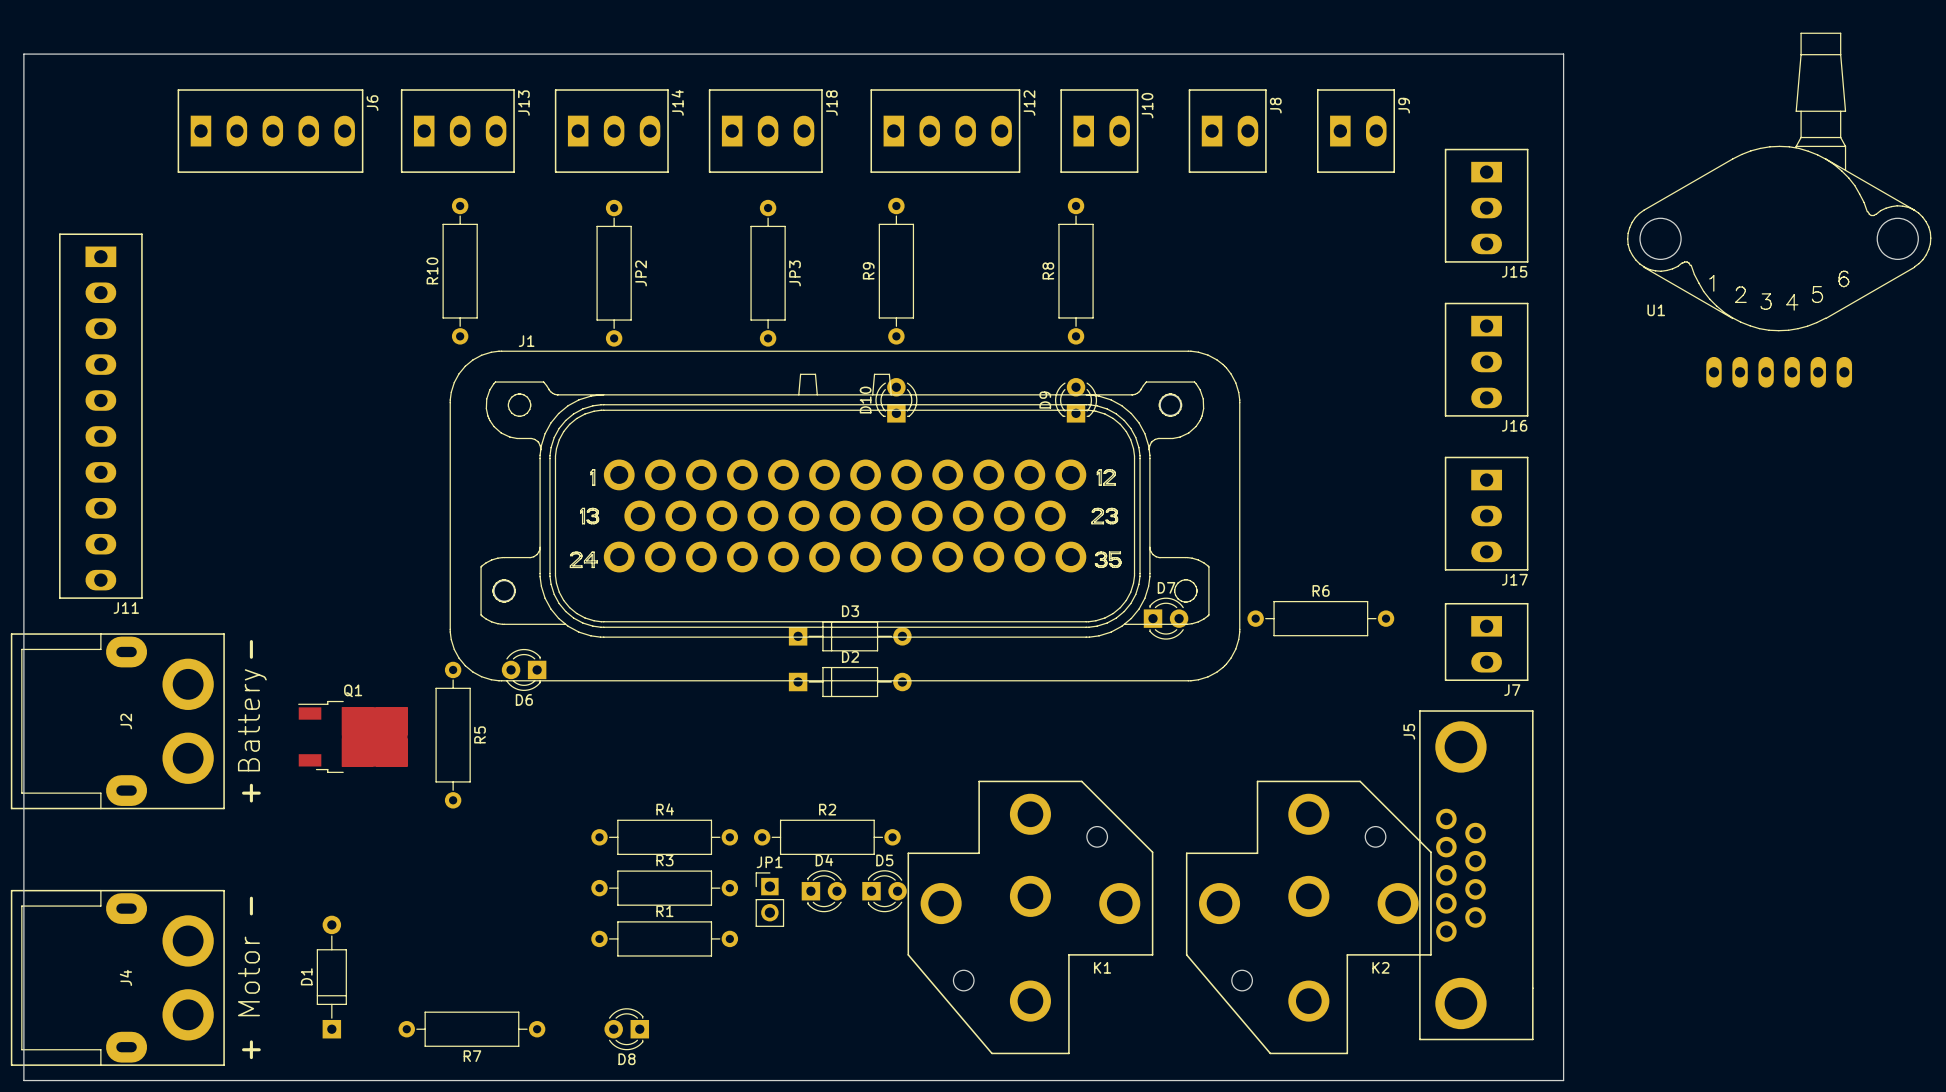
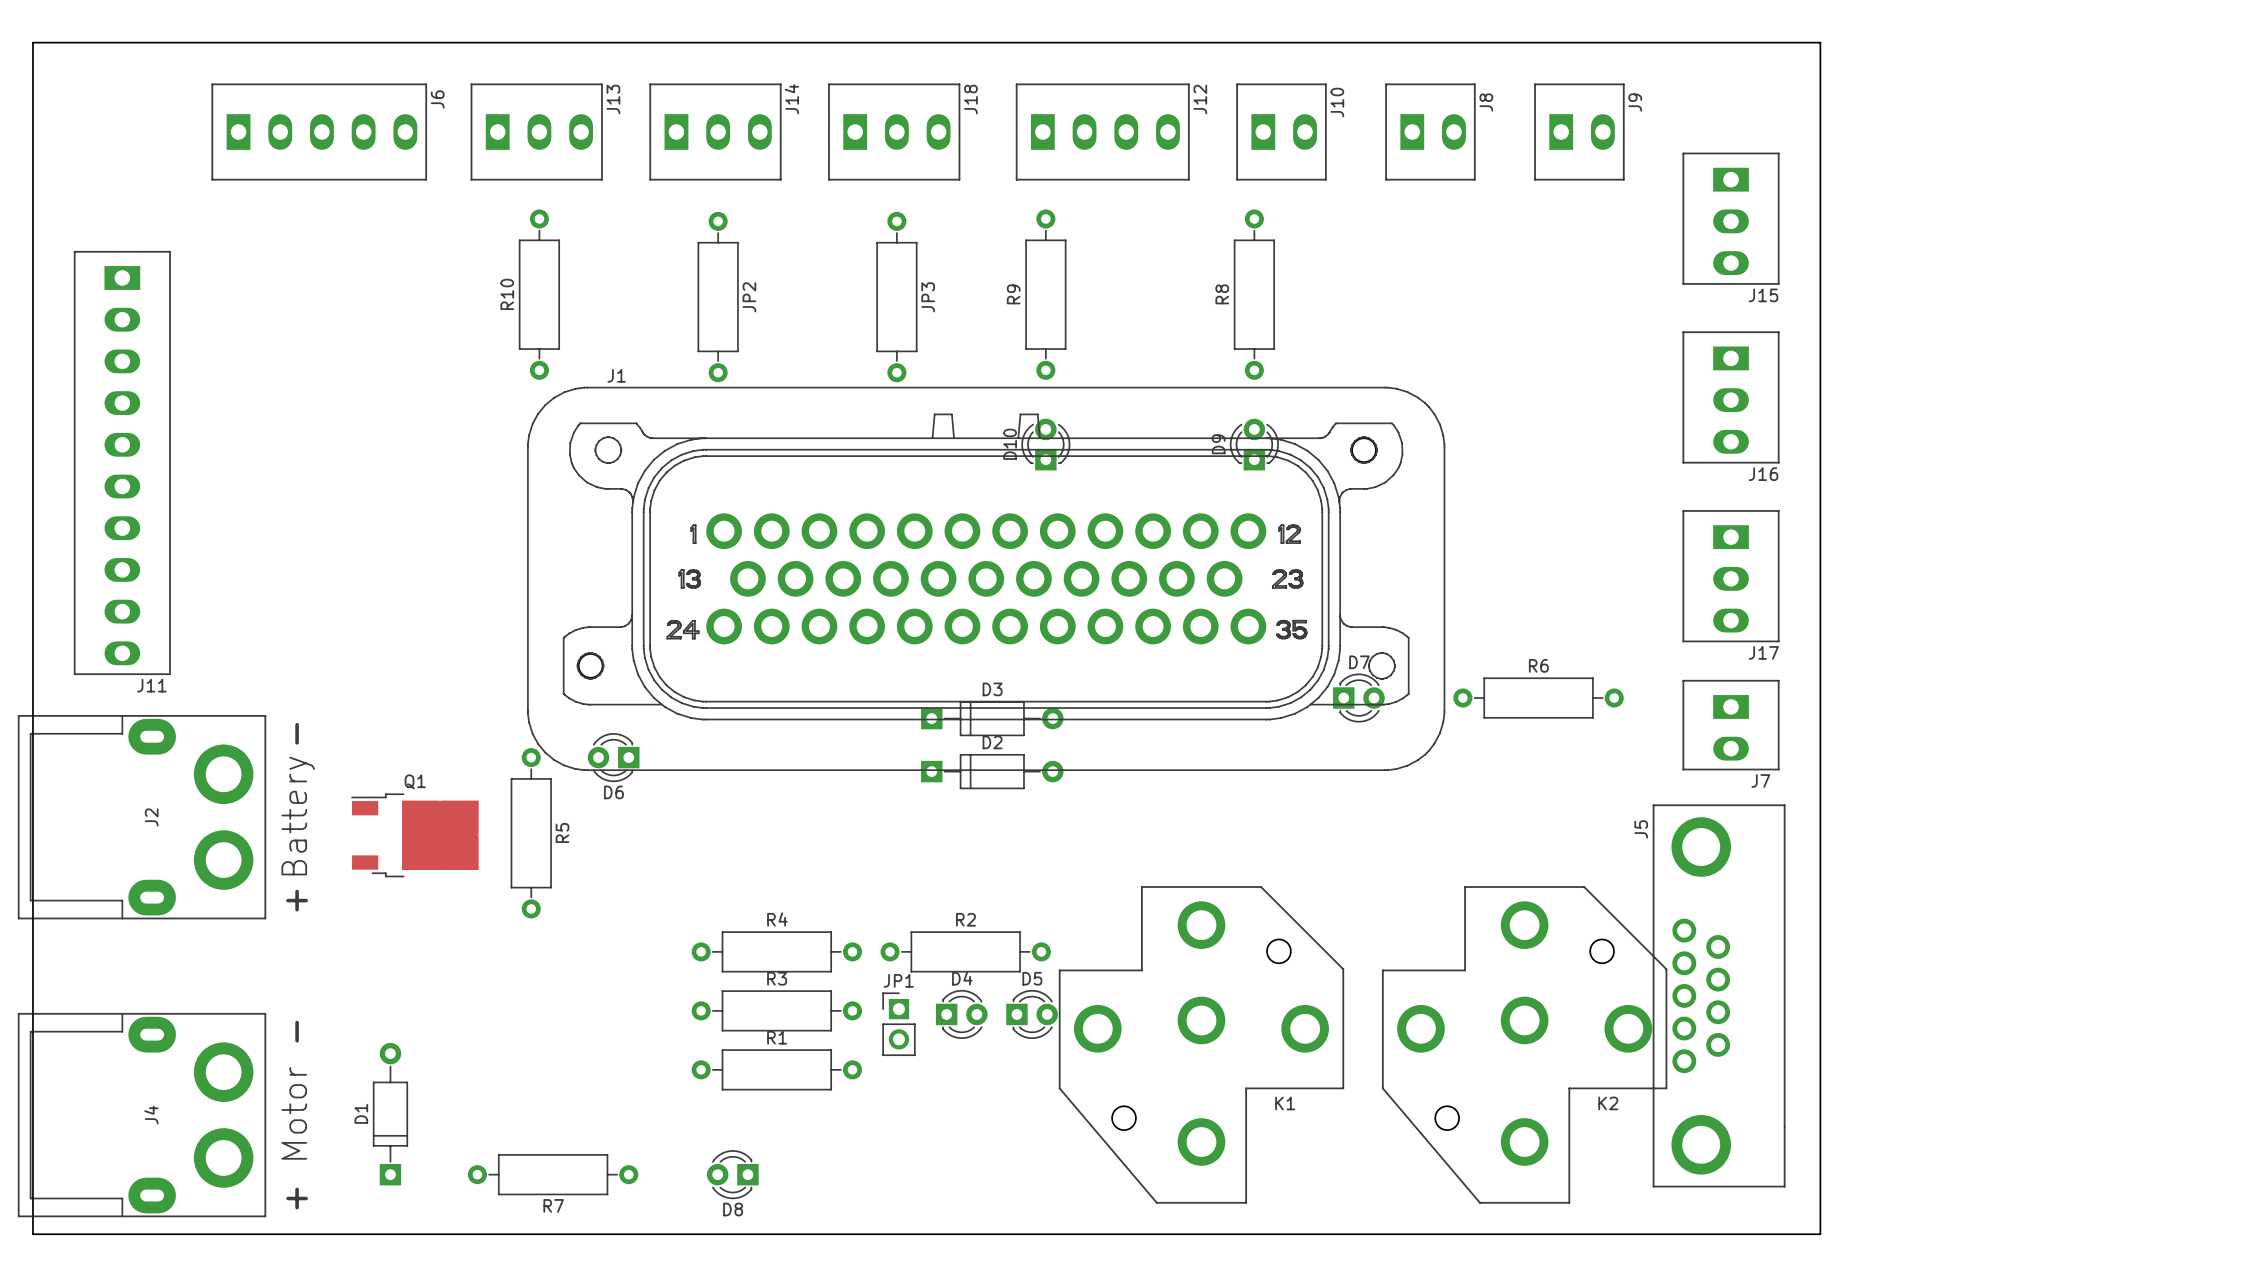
U1: (1779, 210) -> none

